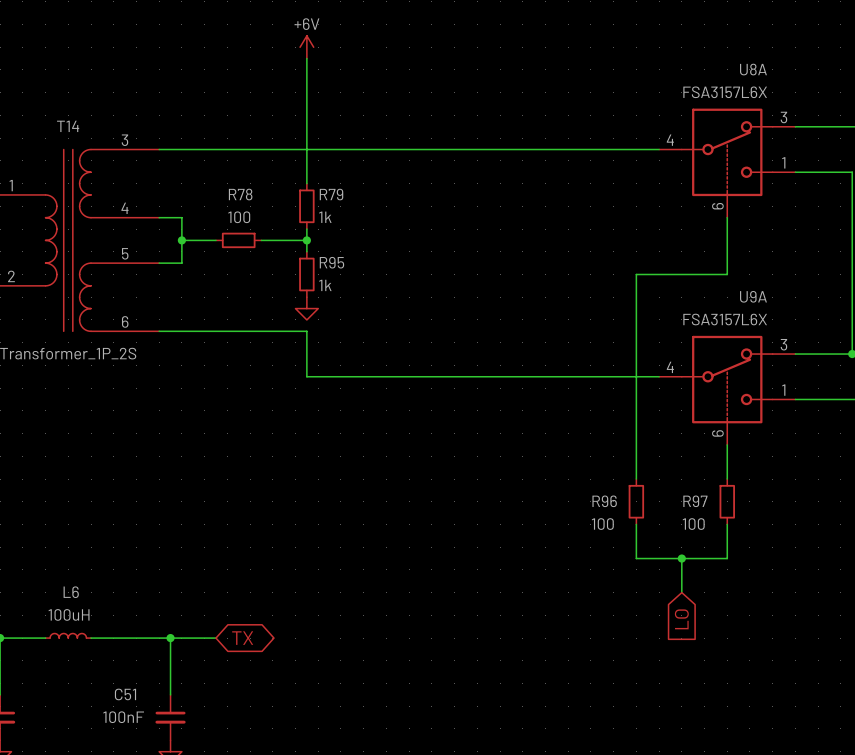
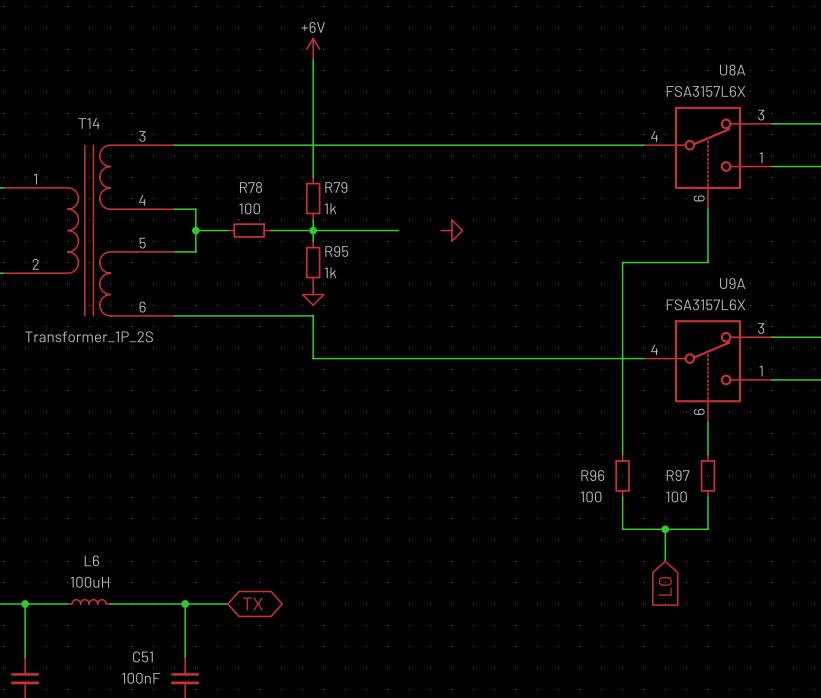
wire: none -> (313, 230) (398, 230)
power symbol: none -> (451, 230)

